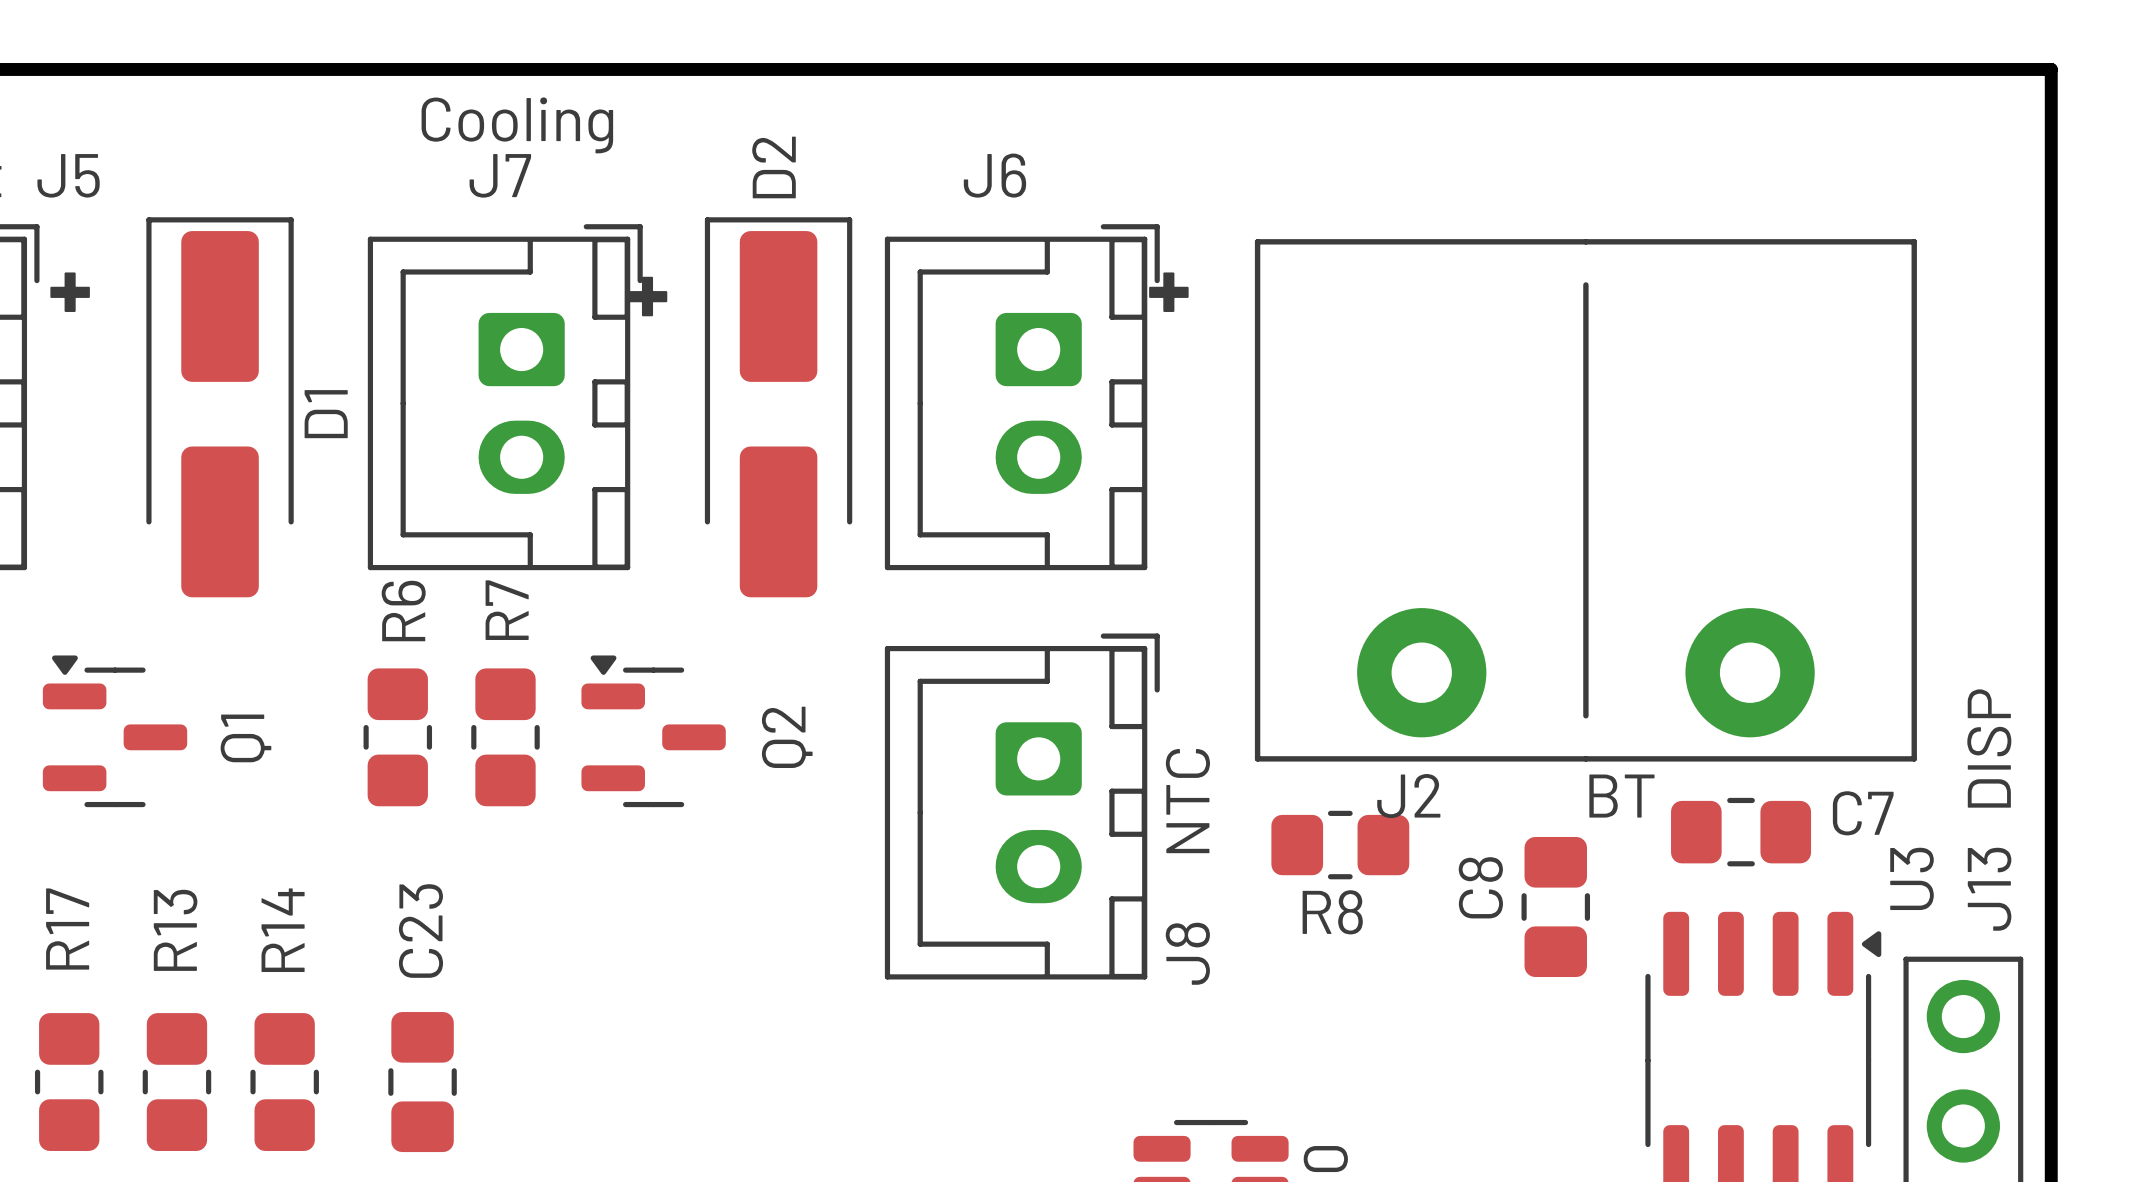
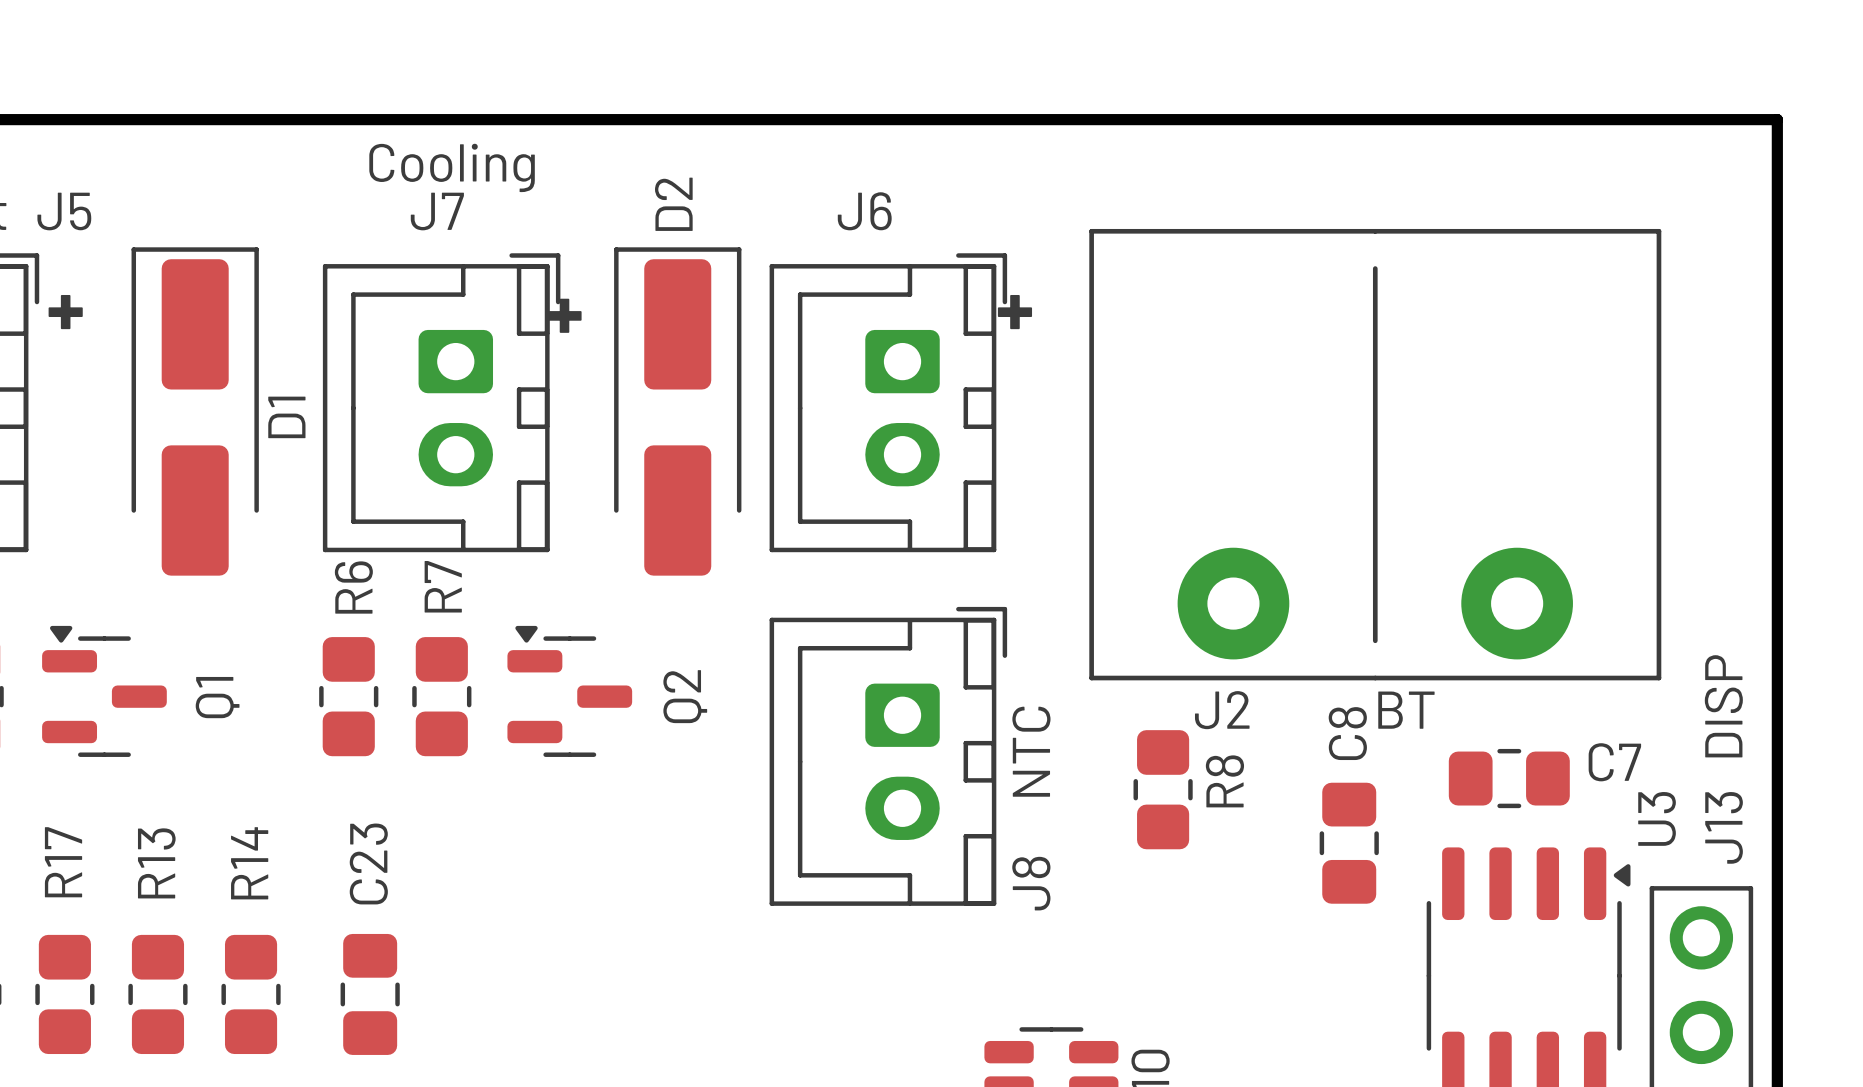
J2 position: (1585, 500) -> (1375, 454)
R8 rotation: 0° (1340, 845) -> 90° clockwise (1163, 789)
C8 name position: C8 (1480, 887) -> C8 (1347, 733)
R8 name position: R8 (1332, 912) -> R8 (1224, 781)

